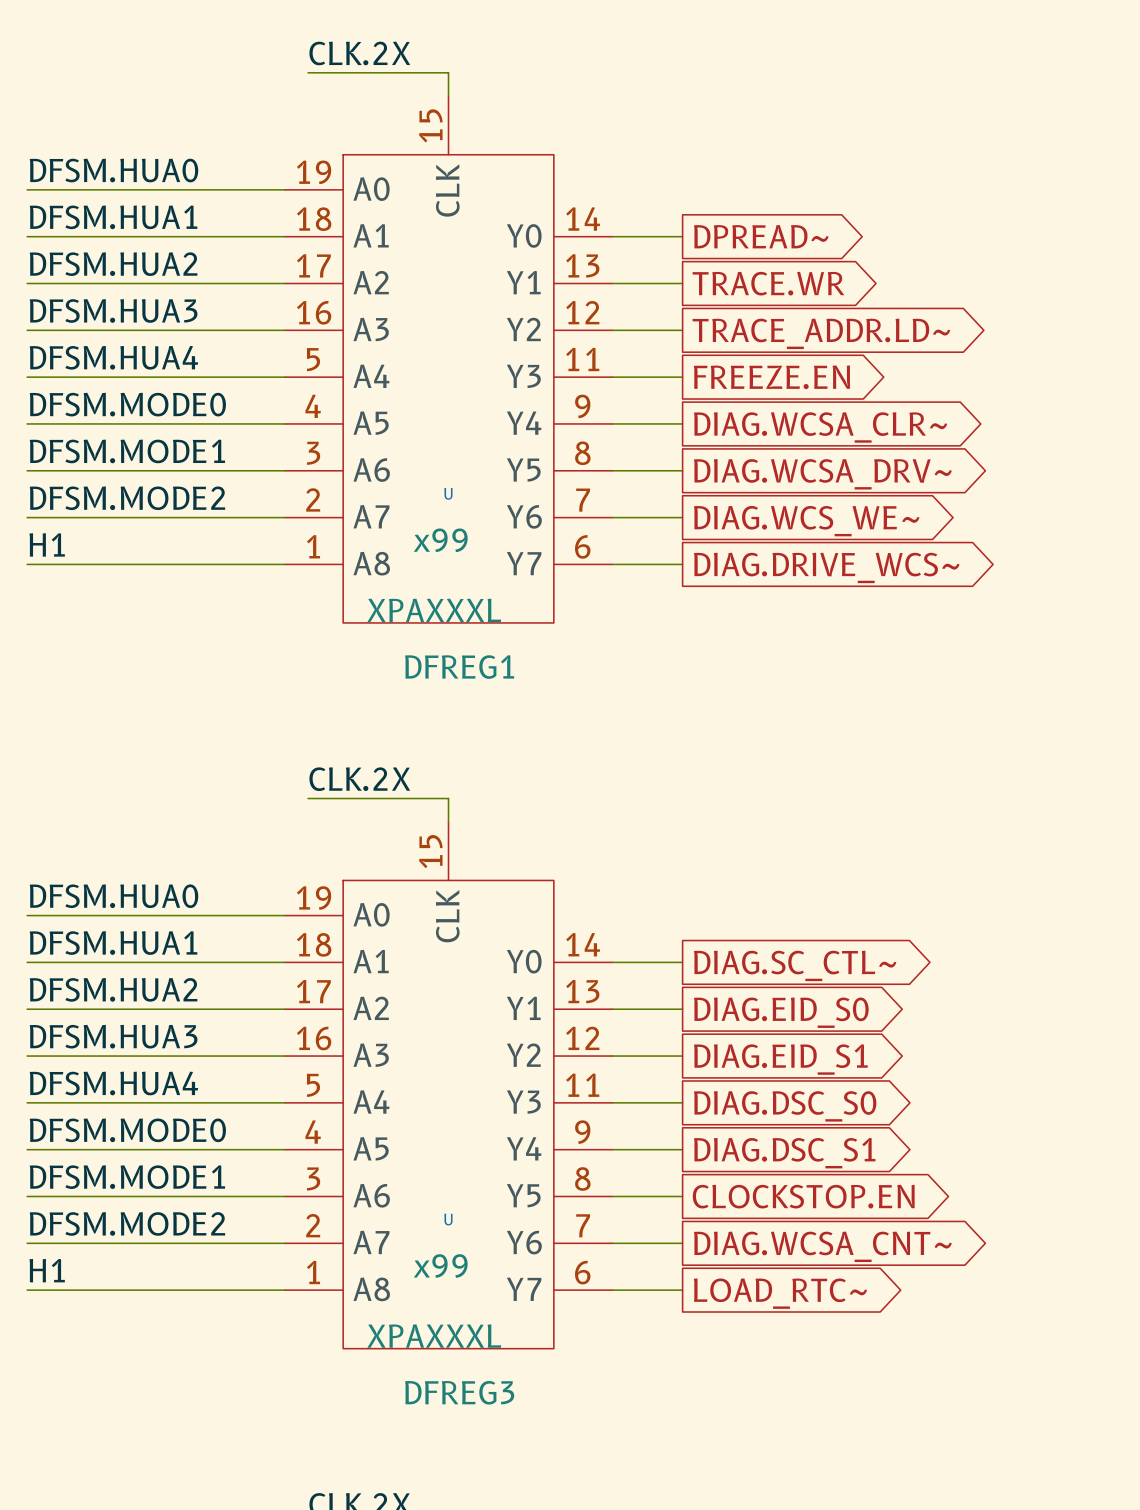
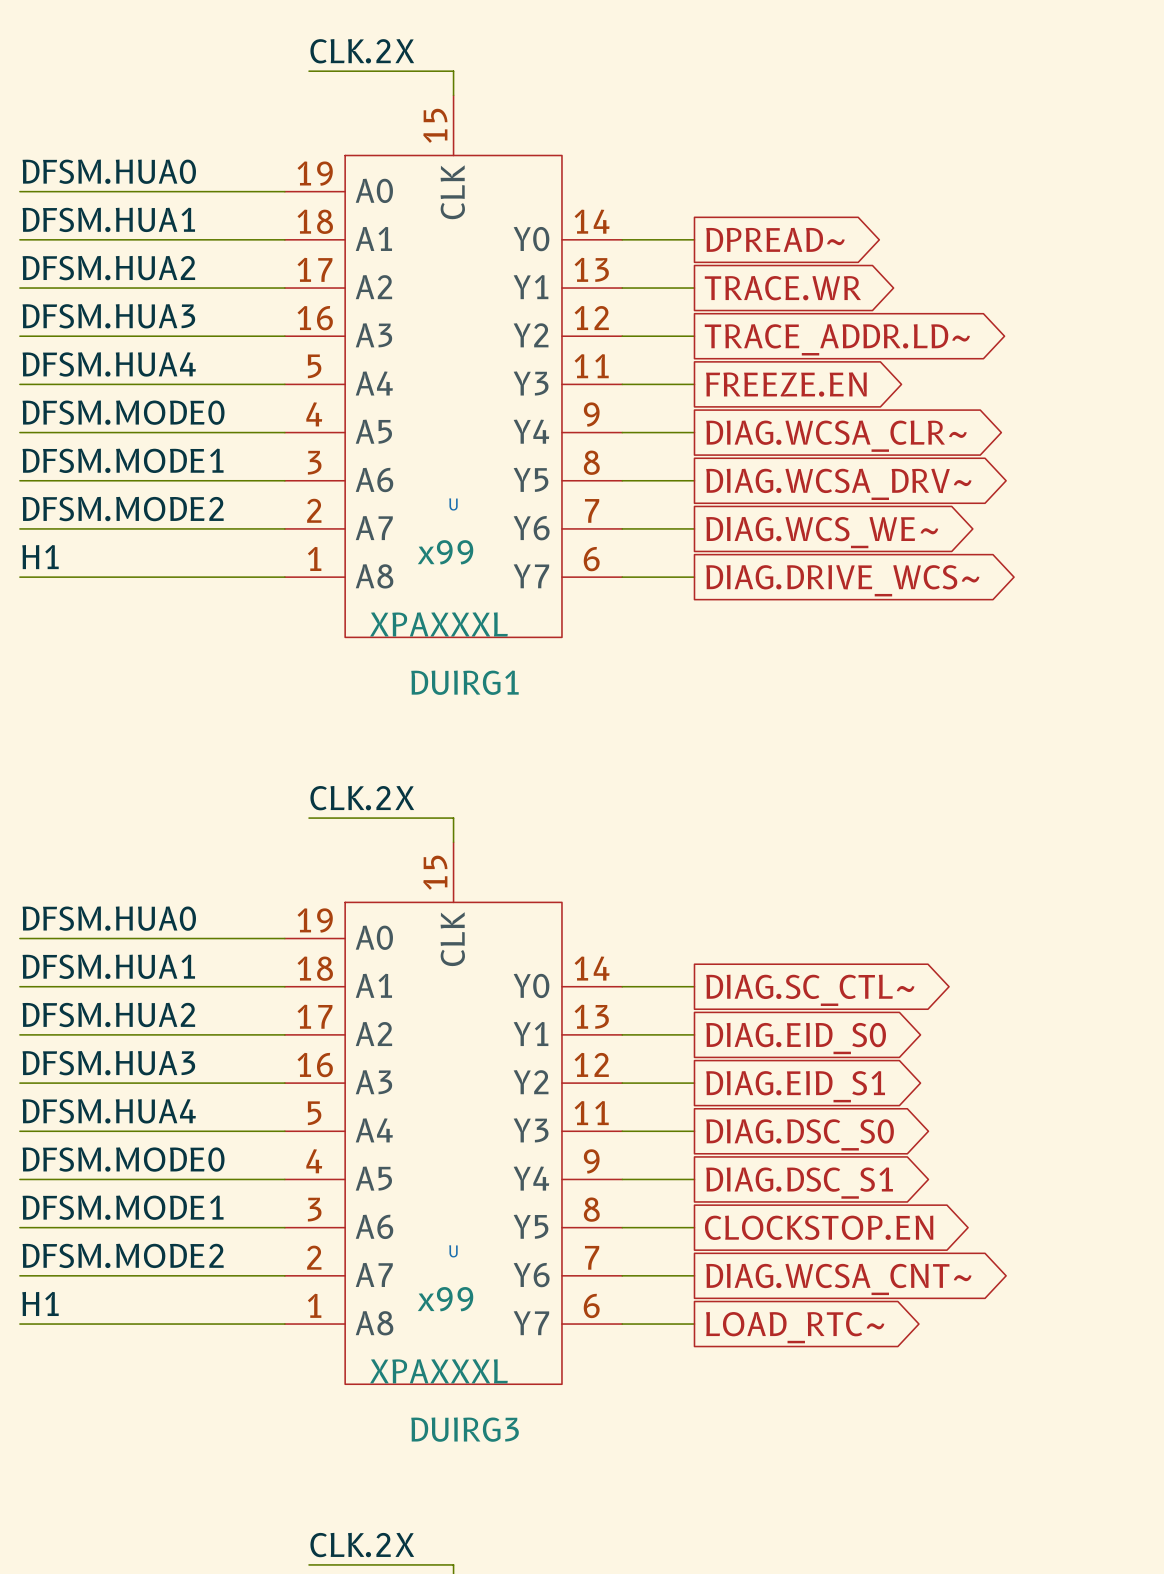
U text: DFREG1 (459, 667) -> DUIRG1 (464, 682)
U text: DFREG3 (459, 1392) -> DUIRG3 (465, 1429)

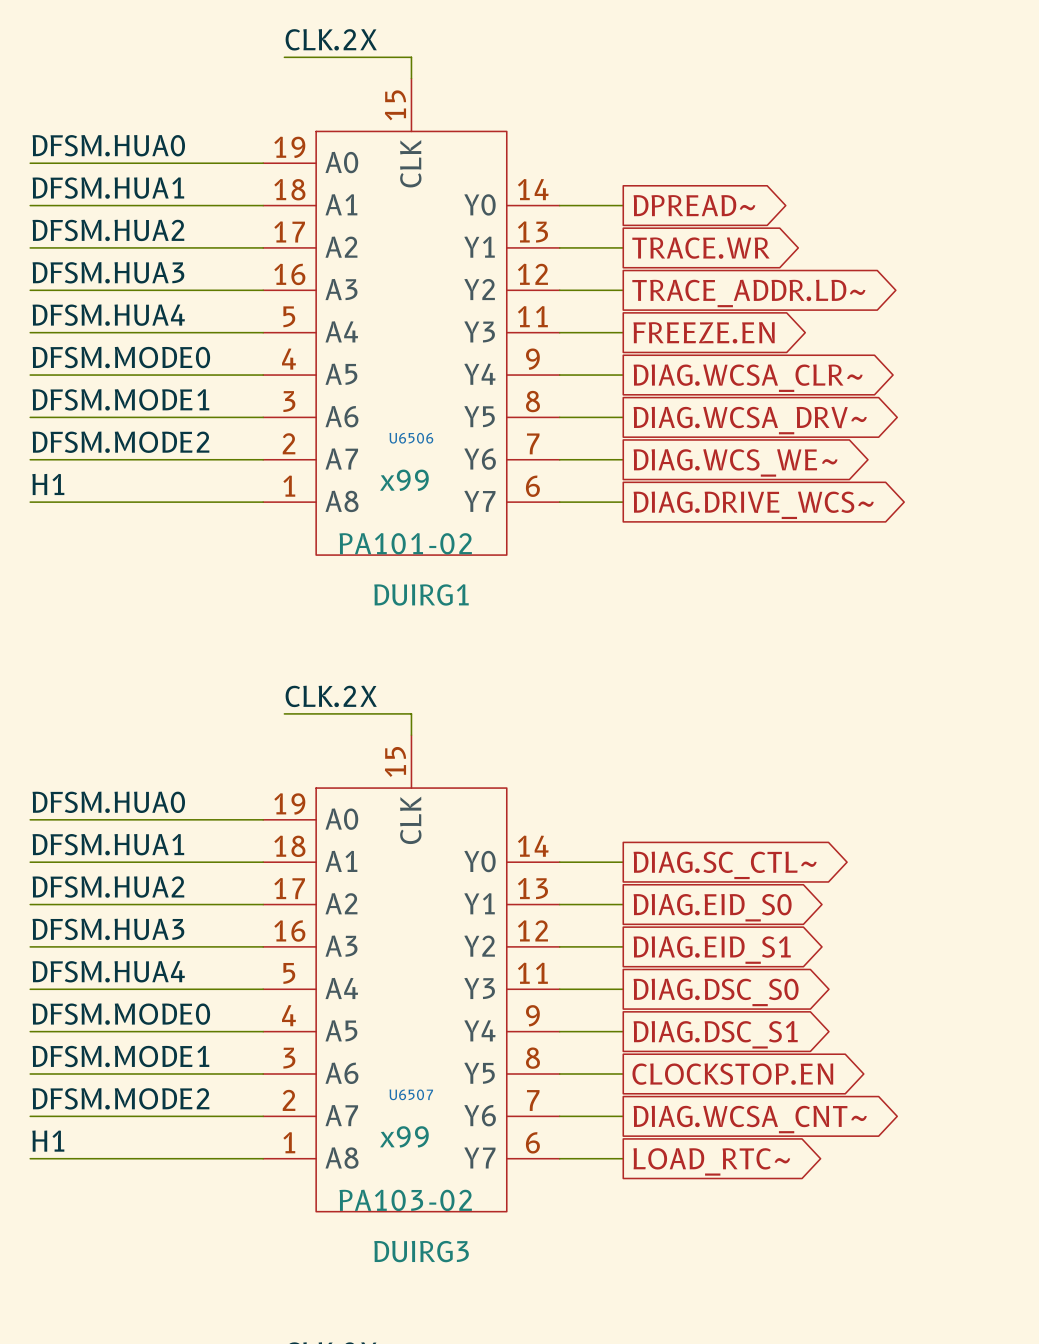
U name: U (453, 504) -> U6506 (411, 438)
U value: XPAXXXL (438, 624) -> PA101-02 (405, 543)
U name: U (453, 1251) -> U6507 (411, 1094)
U value: XPAXXXL (438, 1371) -> PA103-02 (405, 1200)

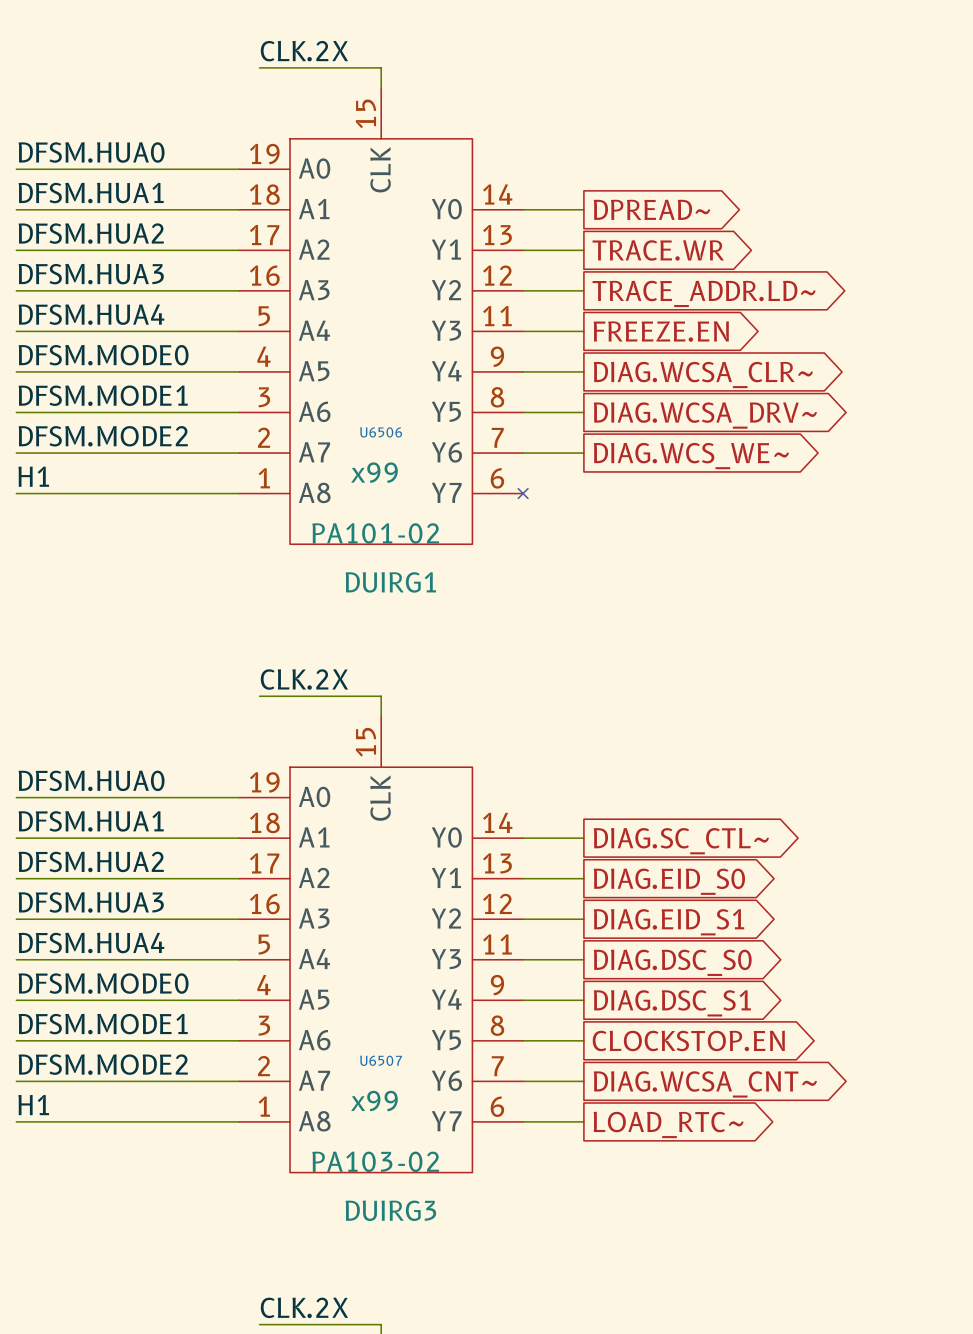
wire: (559, 502) (623, 502) -> none
no-connect mark: none -> (523, 493)
global label: DIAG.DRIVE_WCS~ (753, 505) -> none

